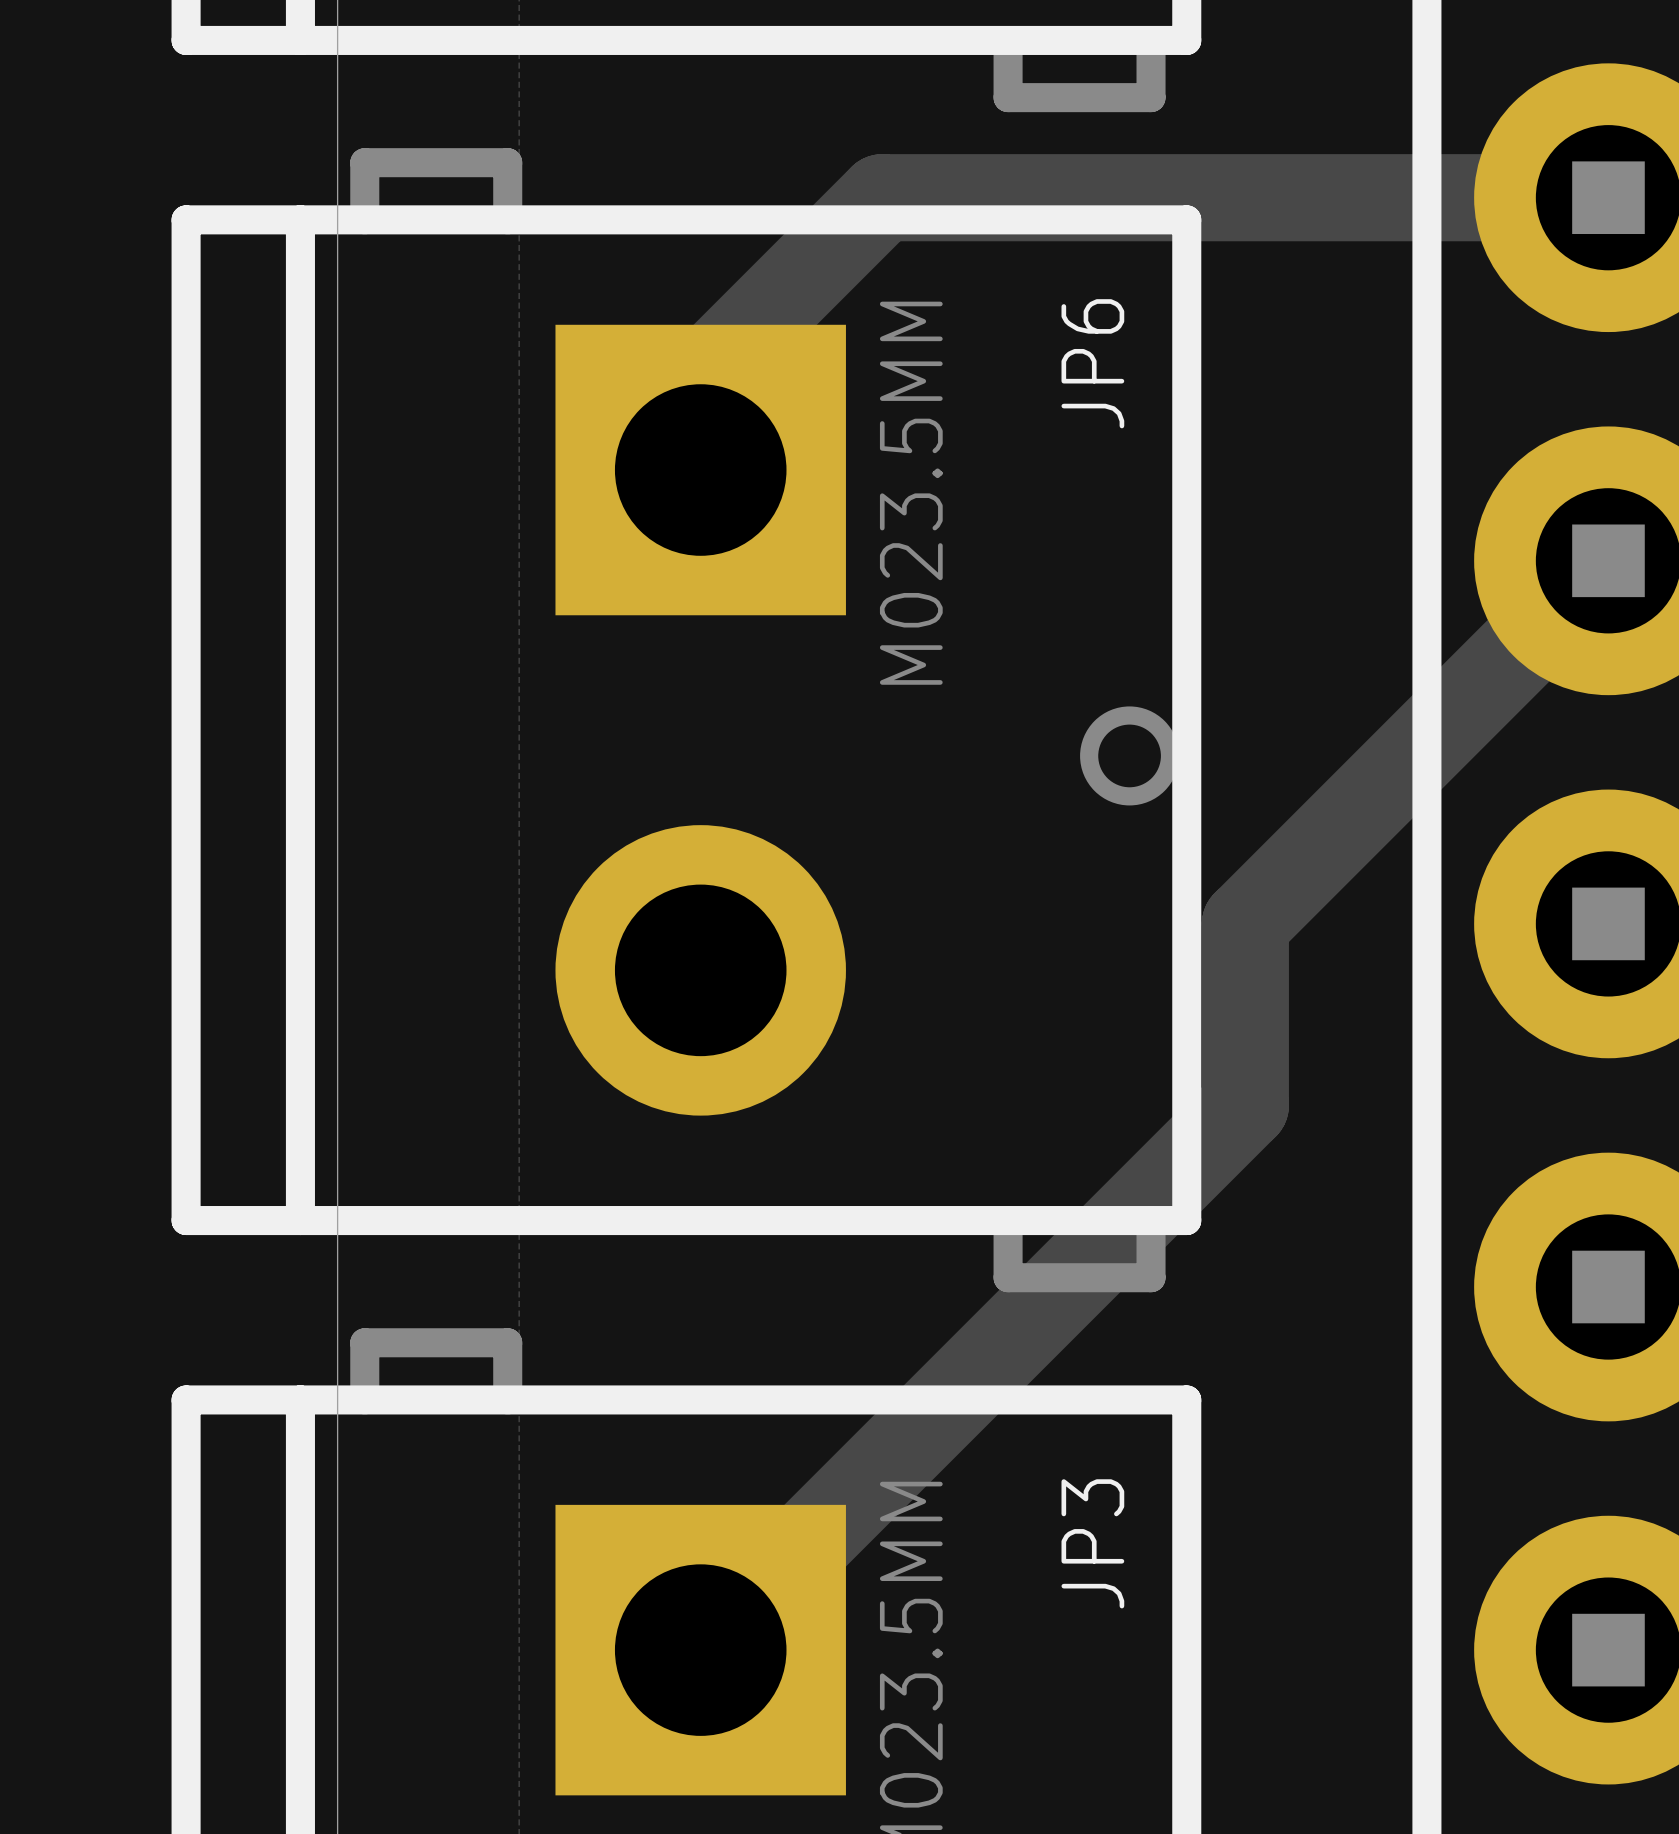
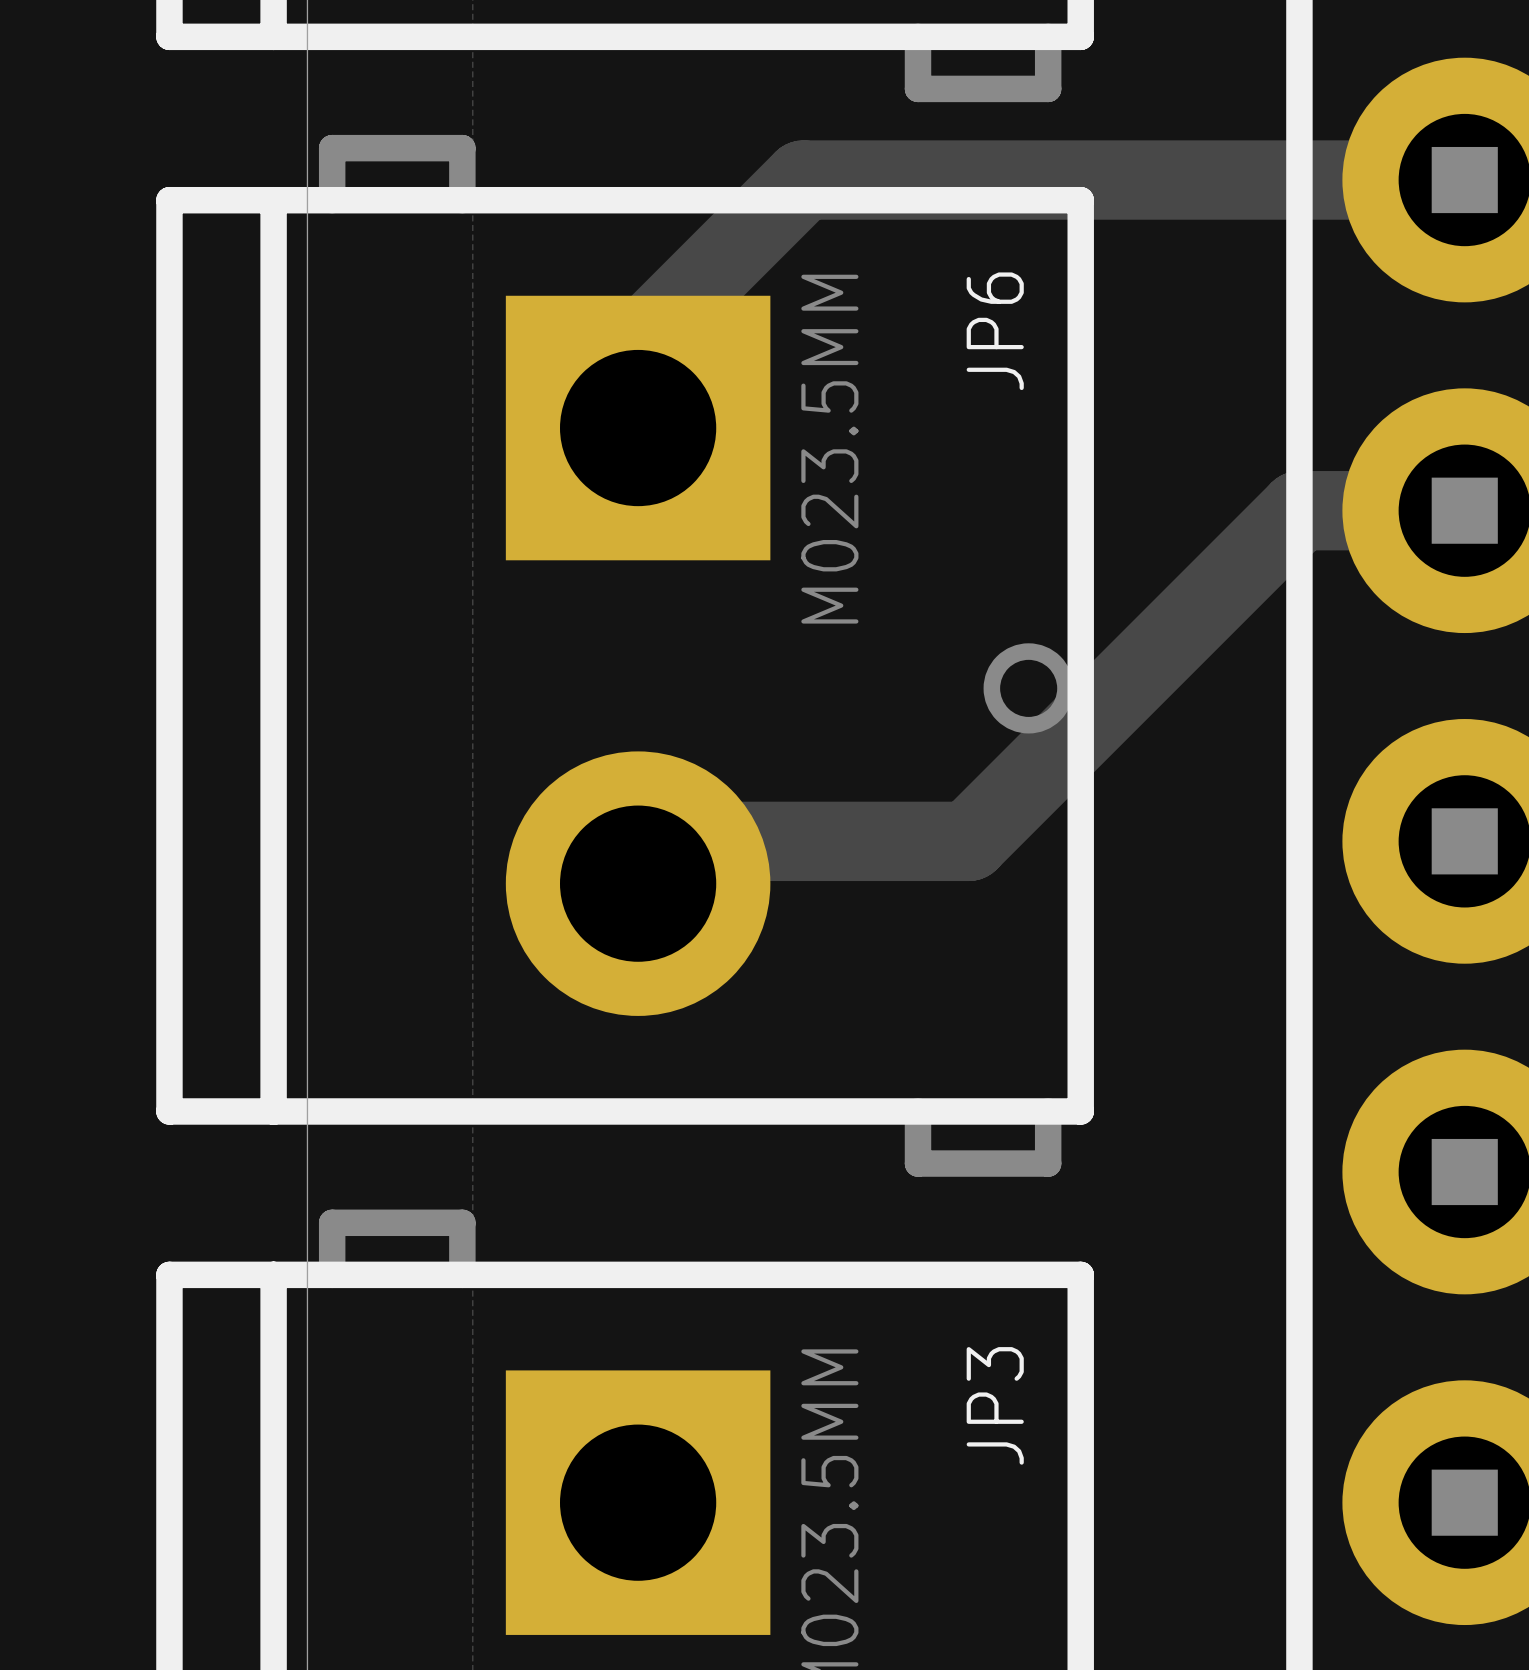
track: (1608, 560) (1245, 923) (1245, 1105) (700, 1650) -> (1464, 510) (1299, 510) (968, 841) (680, 841) (638, 883)

